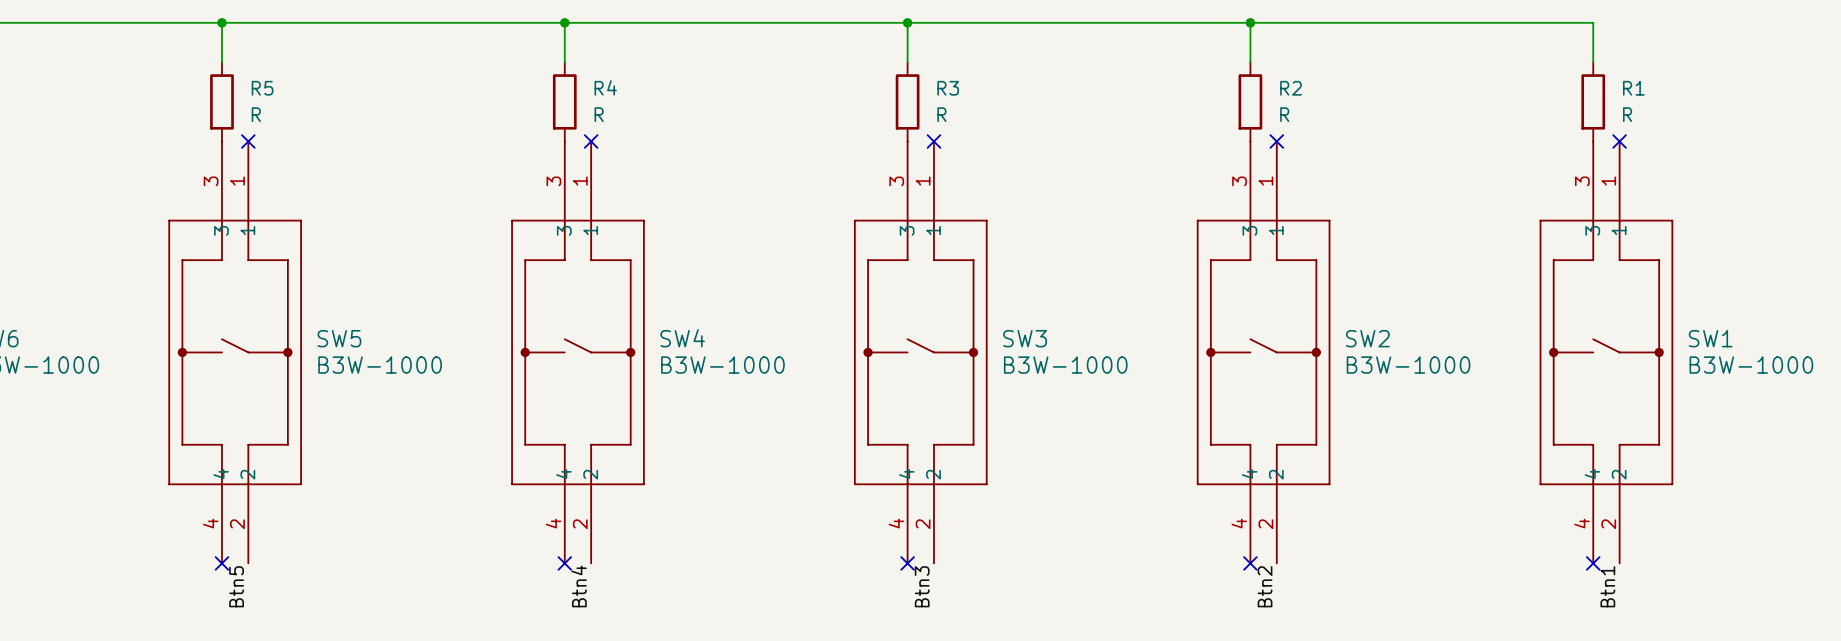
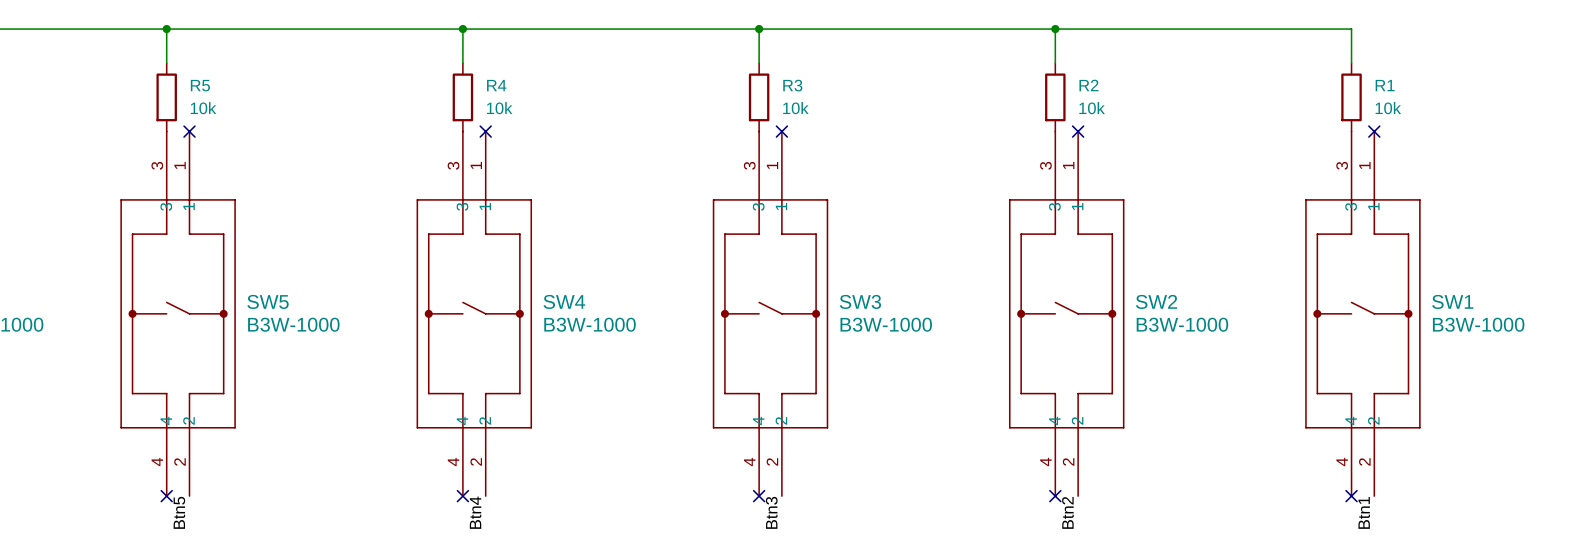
R5 value: R (256, 114) -> 10k (203, 108)
R4 value: R (599, 114) -> 10k (499, 108)
R3 value: R (941, 114) -> 10k (795, 108)
R2 value: R (1284, 114) -> 10k (1092, 108)
R1 value: R (1627, 114) -> 10k (1388, 108)

